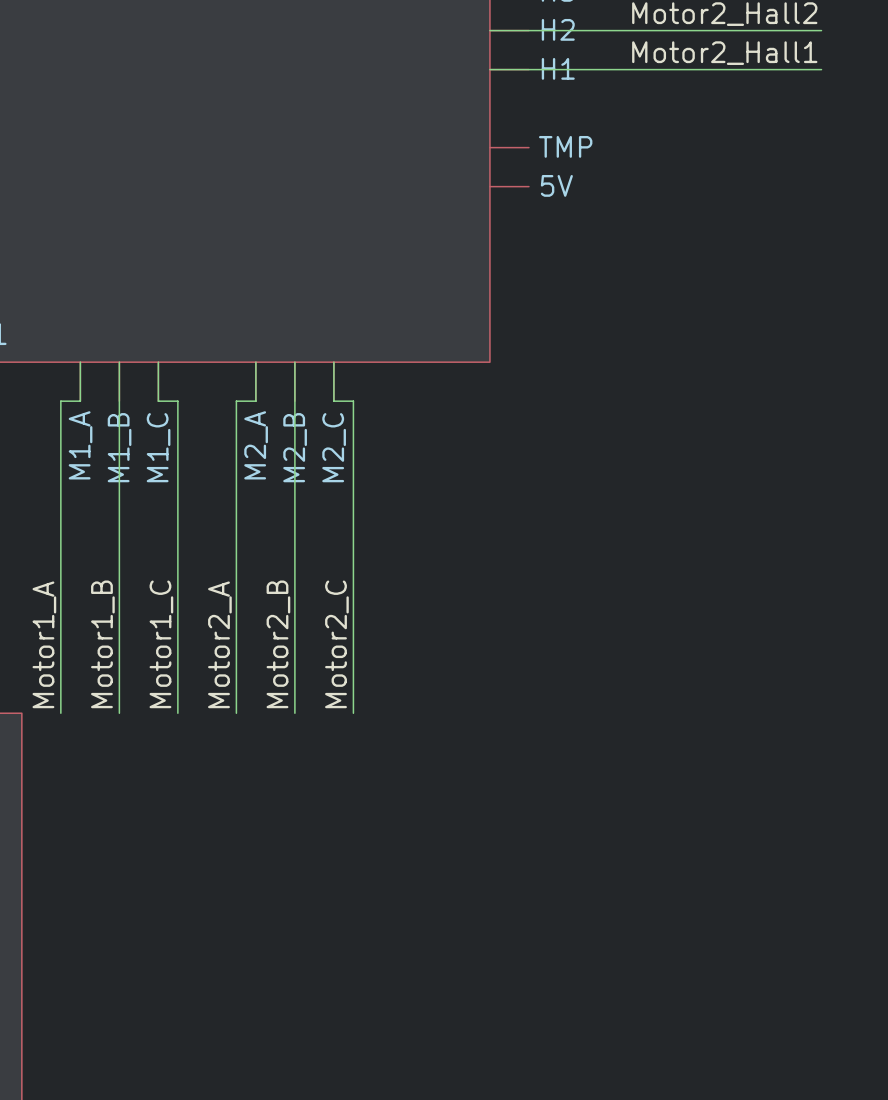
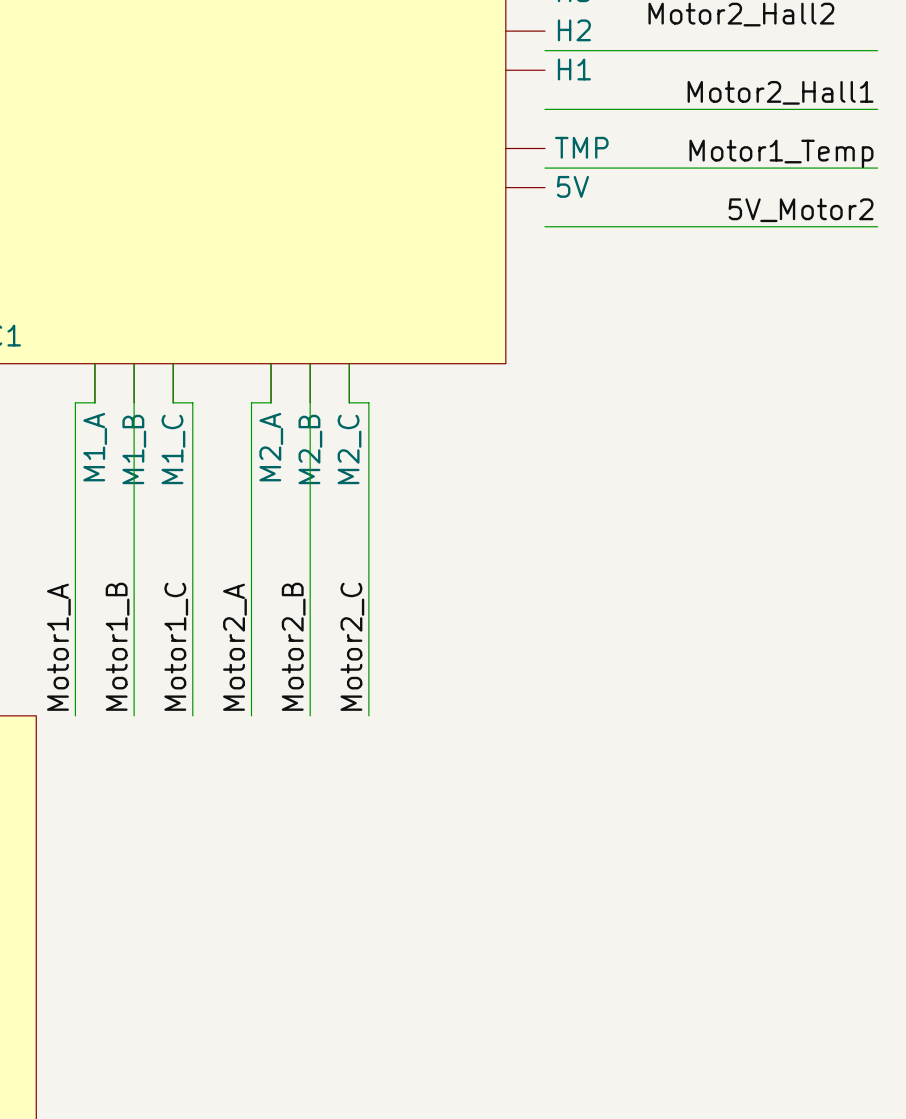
wire: (489, 30) (821, 30) -> (544, 109) (877, 109)
label position: Motor2_Hall1 (724, 53) -> Motor2_Hall1 (780, 92)
wire: (489, 69) (821, 69) -> (544, 50) (877, 50)
label: none -> Motor1_Temp (781, 153)
wire: none -> (544, 168) (877, 168)
label: none -> 5V_Motor2 (801, 210)
wire: none -> (544, 226) (877, 226)

